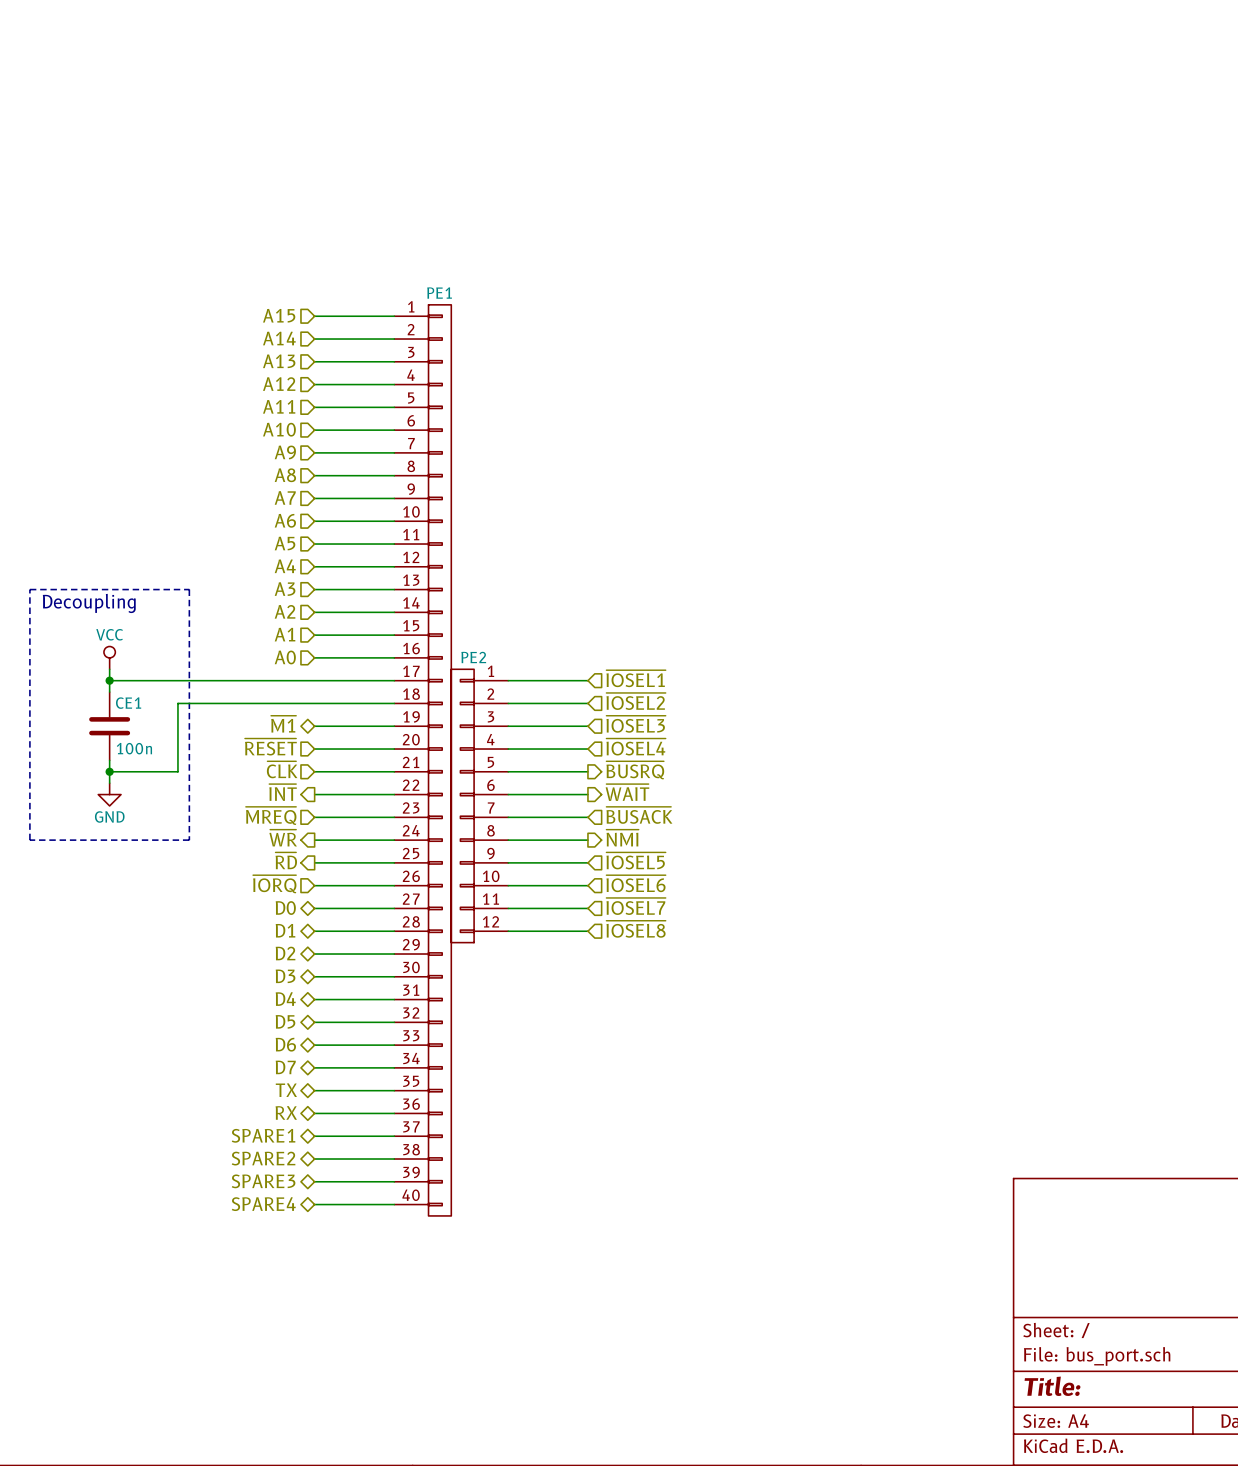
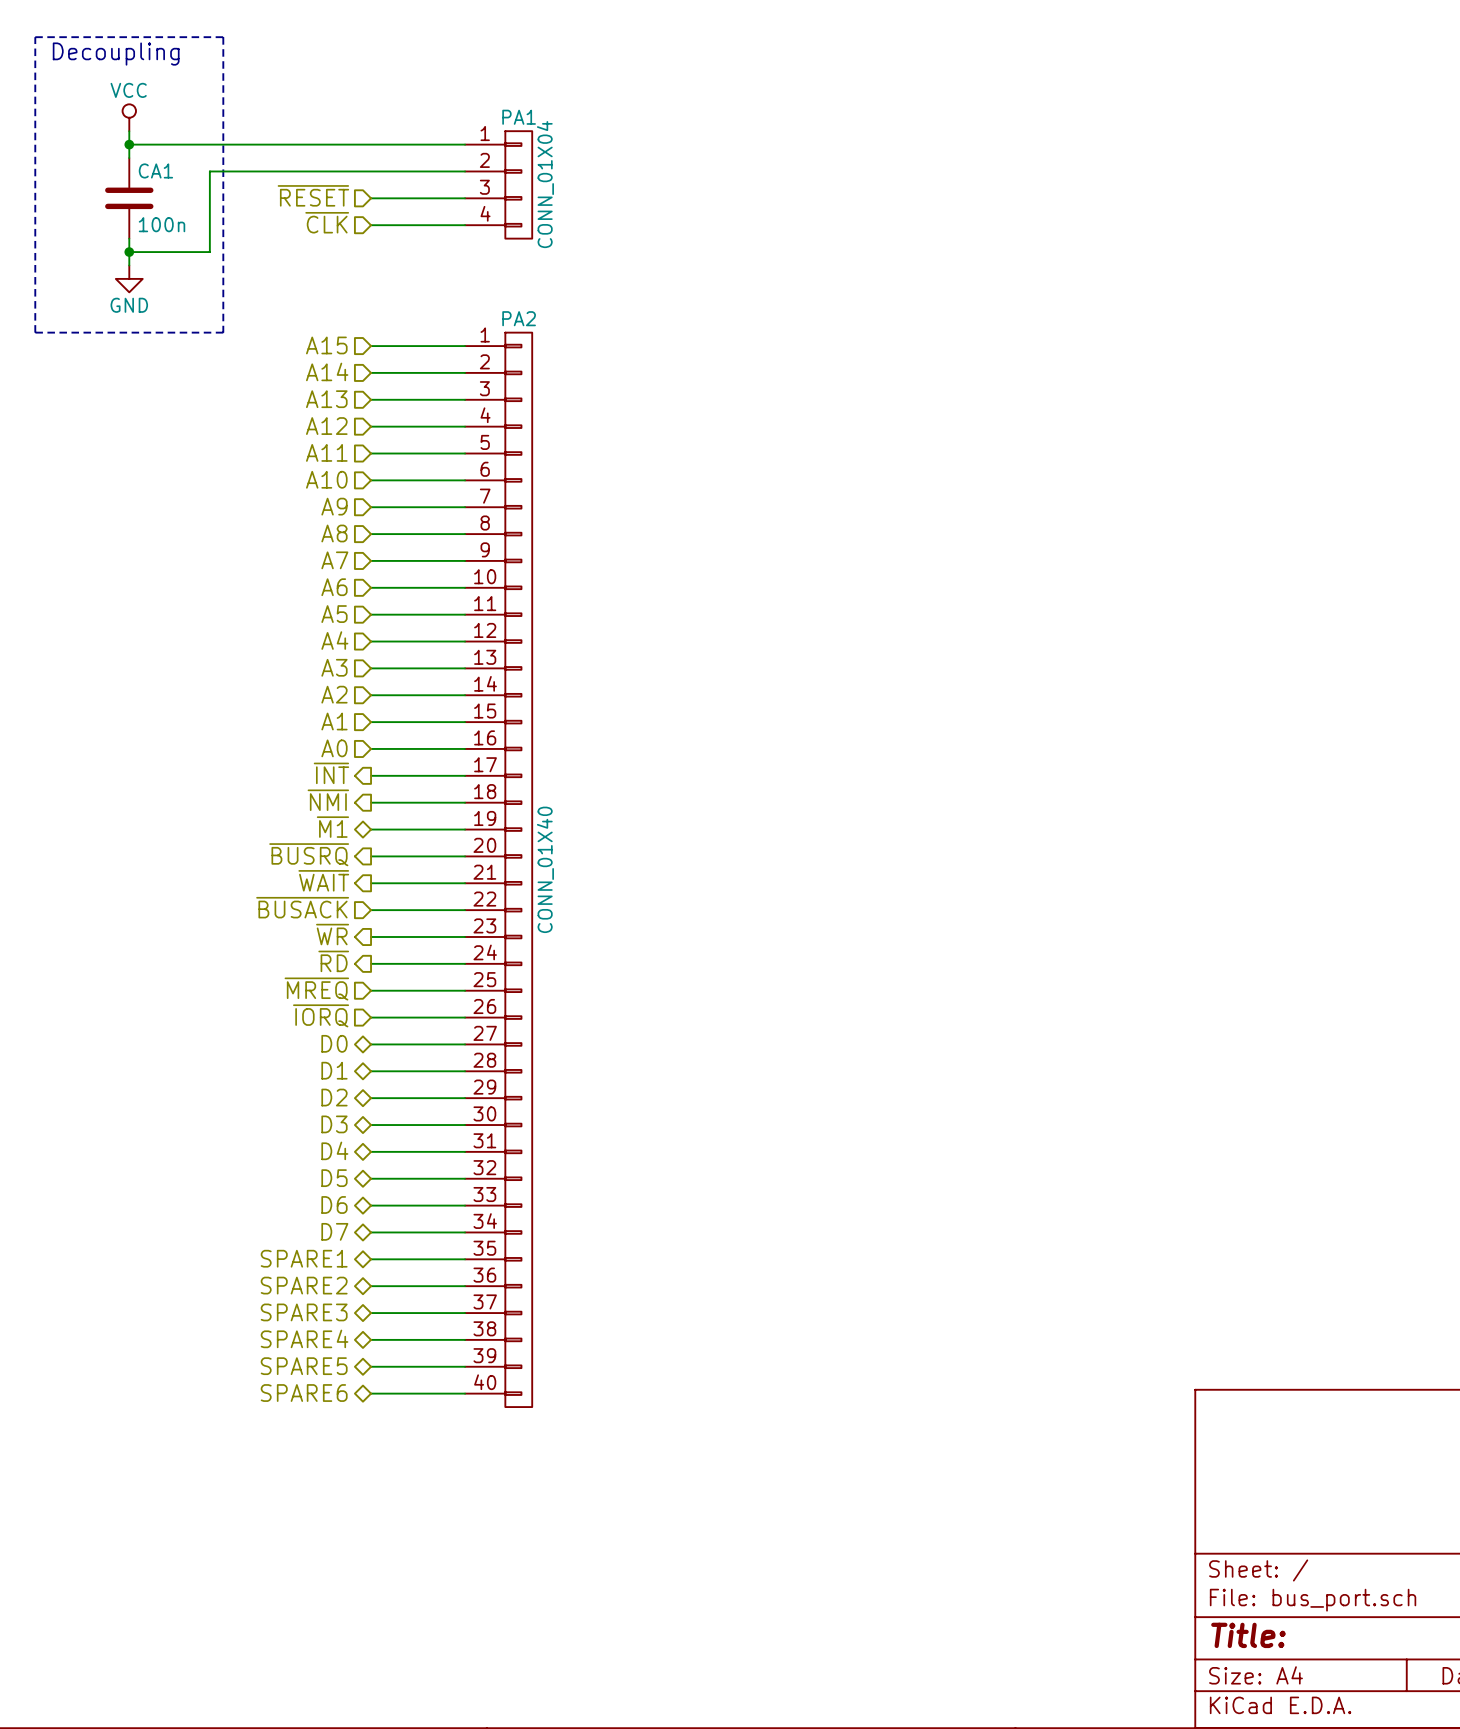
line: none -> (35, 37) (223, 37) (223, 332) (35, 332) (35, 37)
text: none -> Decoupling (116, 54)
power symbol: none -> VCC (129, 117)
wire: none -> (129, 131) (129, 158)
wire: none -> (129, 144) (465, 144)
junction: none -> (129, 144)
wire: none -> (465, 171) (209, 171) (209, 252) (129, 252)
PA1: none -> CONN_01X04 (498, 184)
hierarchical label: none -> ~{RESET} (313, 195)
CA1: none -> 100n (129, 198)
wire: none -> (371, 198) (465, 198)
hierarchical label: none -> ~{CLK} (327, 222)
wire: none -> (371, 225) (465, 225)
wire: none -> (129, 238) (129, 265)
junction: none -> (129, 252)
power symbol: none -> GND (129, 278)
hierarchical label: none -> A15 (326, 345)
wire: none -> (371, 346) (465, 346)
hierarchical label: A15 (279, 315) -> A14 (327, 371)
hierarchical label: A14 (279, 338) -> A13 (326, 399)
hierarchical label: A13 (279, 361) -> A12 (326, 426)
hierarchical label: A12 (279, 384) -> A11 (326, 452)
hierarchical label: A11 (279, 406) -> A10 (326, 479)
hierarchical label: A10 (279, 429) -> A9 (334, 506)
hierarchical label: A9 (285, 452) -> A8 (334, 533)
hierarchical label: A8 (285, 475) -> A7 (334, 560)
hierarchical label: A7 (285, 497) -> A6 (334, 587)
hierarchical label: A6 (285, 520) -> A5 (334, 614)
hierarchical label: A5 (285, 543) -> A4 (334, 640)
hierarchical label: A4 (285, 566) -> A3 (334, 667)
line: (29, 589) (189, 589) (189, 840) (29, 840) (29, 589) -> none
hierarchical label: A3 (285, 589) -> A2 (334, 694)
text: Decoupling (89, 603) -> none
hierarchical label: A2 (285, 611) -> A1 (334, 721)
hierarchical label: A1 (285, 634) -> A0 (334, 748)
power symbol: VCC (109, 657) -> none
hierarchical label shape: input (285, 657) -> output (331, 773)
hierarchical label: A0 (285, 657) -> ~{INT} (331, 773)
wire: (109, 669) (109, 692) -> none
hierarchical label: none -> ~{NMI} (328, 800)
hierarchical label: ~{IOSEL1} (636, 678) -> none
wire: (109, 680) (314, 680) -> none
junction: (109, 680) -> none
wire: (508, 680) (587, 680) -> none
hierarchical label: none -> ~{M1} (332, 827)
hierarchical label: ~{IOSEL2} (636, 701) -> none
wire: (314, 703) (177, 703) (177, 771) (109, 771) -> none
wire: (508, 703) (587, 703) -> none
hierarchical label shape: bidirectional (283, 724) -> output (309, 854)
hierarchical label: ~{M1} (283, 724) -> ~{BUSRQ} (309, 854)
hierarchical label: ~{IOSEL3} (636, 724) -> none
CE1: 100n (109, 726) -> none
wire: (508, 726) (587, 726) -> none
PA2: none -> CONN_01X40 (498, 869)
hierarchical label shape: input (270, 747) -> output (323, 880)
hierarchical label: ~{RESET} (270, 747) -> ~{WAIT} (323, 880)
hierarchical label: ~{IOSEL4} (636, 747) -> none
wire: (508, 749) (587, 749) -> none
wire: (109, 760) (109, 783) -> none
PE1: (422, 760) -> none
hierarchical label: ~{CLK} (282, 769) -> ~{BUSACK} (302, 907)
hierarchical label: ~{BUSRQ} (635, 770) -> none
junction: (109, 771) -> none
wire: (508, 771) (587, 771) -> none
hierarchical label: ~{INT} (283, 792) -> ~{WR} (332, 934)
hierarchical label: ~{WAIT} (627, 792) -> none
power symbol: GND (109, 794) -> none
wire: (508, 794) (587, 794) -> none
PE2: (479, 805) -> none
hierarchical label shape: input (271, 815) -> output (333, 961)
hierarchical label: ~{MREQ} (271, 815) -> ~{RD} (333, 961)
hierarchical label: ~{BUSACK} (639, 815) -> none
wire: (508, 817) (587, 817) -> none
hierarchical label shape: output (283, 838) -> input (316, 989)
hierarchical label: ~{WR} (283, 838) -> ~{MREQ} (316, 989)
hierarchical label: ~{NMI} (622, 838) -> none
wire: (508, 840) (587, 840) -> none
hierarchical label shape: output (286, 860) -> input (321, 1015)
hierarchical label: ~{RD} (286, 860) -> ~{IORQ} (321, 1015)
hierarchical label: ~{IOSEL5} (636, 860) -> none
wire: (508, 862) (587, 862) -> none
hierarchical label: ~{IOSEL6} (636, 883) -> none
hierarchical label shape: input (274, 884) -> bidirectional (334, 1043)
hierarchical label: ~{IORQ} (274, 884) -> D0 (334, 1043)
wire: (508, 885) (587, 885) -> none
hierarchical label: ~{IOSEL7} (636, 906) -> none
hierarchical label: D0 (285, 908) -> D1 (334, 1070)
wire: (508, 908) (587, 908) -> none
hierarchical label: ~{IOSEL8} (636, 929) -> none
hierarchical label: D1 (285, 930) -> D2 (334, 1097)
wire: (508, 931) (587, 931) -> none
hierarchical label: D2 (285, 953) -> D3 (334, 1124)
hierarchical label: D3 (285, 976) -> D4 (334, 1150)
hierarchical label: D4 (285, 999) -> D5 (334, 1178)
hierarchical label: D5 (285, 1021) -> D6 (334, 1204)
hierarchical label: D6 (285, 1044) -> D7 (334, 1231)
hierarchical label: D7 (285, 1067) -> SPARE1 (304, 1258)
hierarchical label: TX (286, 1090) -> SPARE2 (304, 1285)
hierarchical label: RX (286, 1112) -> SPARE3 (304, 1312)
hierarchical label: SPARE1 (263, 1135) -> SPARE4 (304, 1338)
hierarchical label: SPARE2 (263, 1158) -> SPARE5 (304, 1366)
hierarchical label: SPARE3 (263, 1181) -> SPARE6 (304, 1393)
hierarchical label: SPARE4 (263, 1204) -> none
wire: (314, 1204) (394, 1204) -> none

